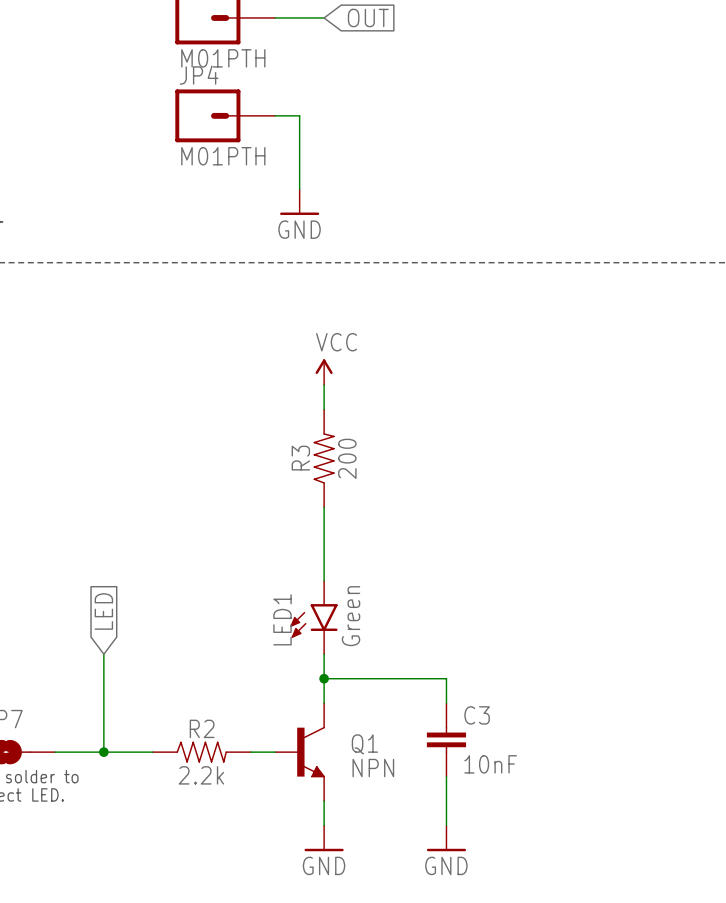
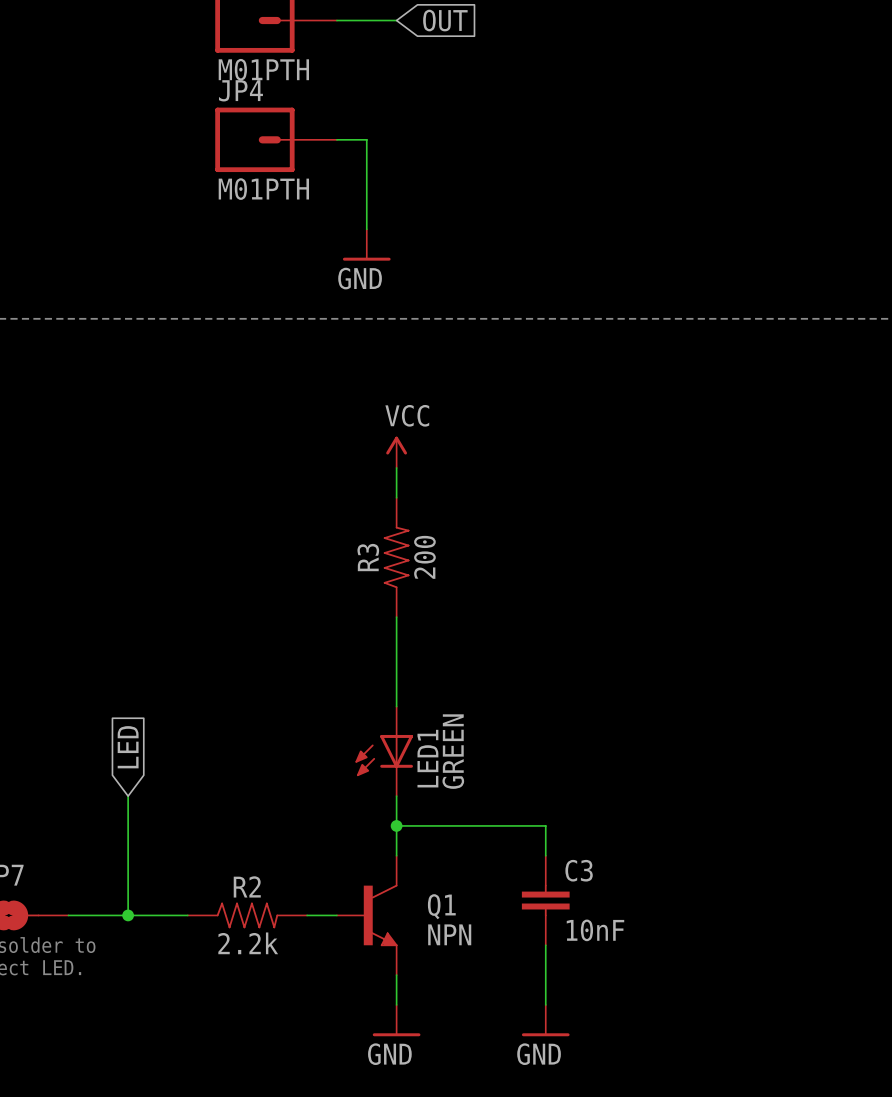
LED1 symbol: [290, 580, 338, 655] -> [355, 706, 414, 797]
LED1 value: Green (351, 616) -> GREEN (453, 751)
LED1 name position: LED1 (282, 619) -> LED1 (427, 758)

